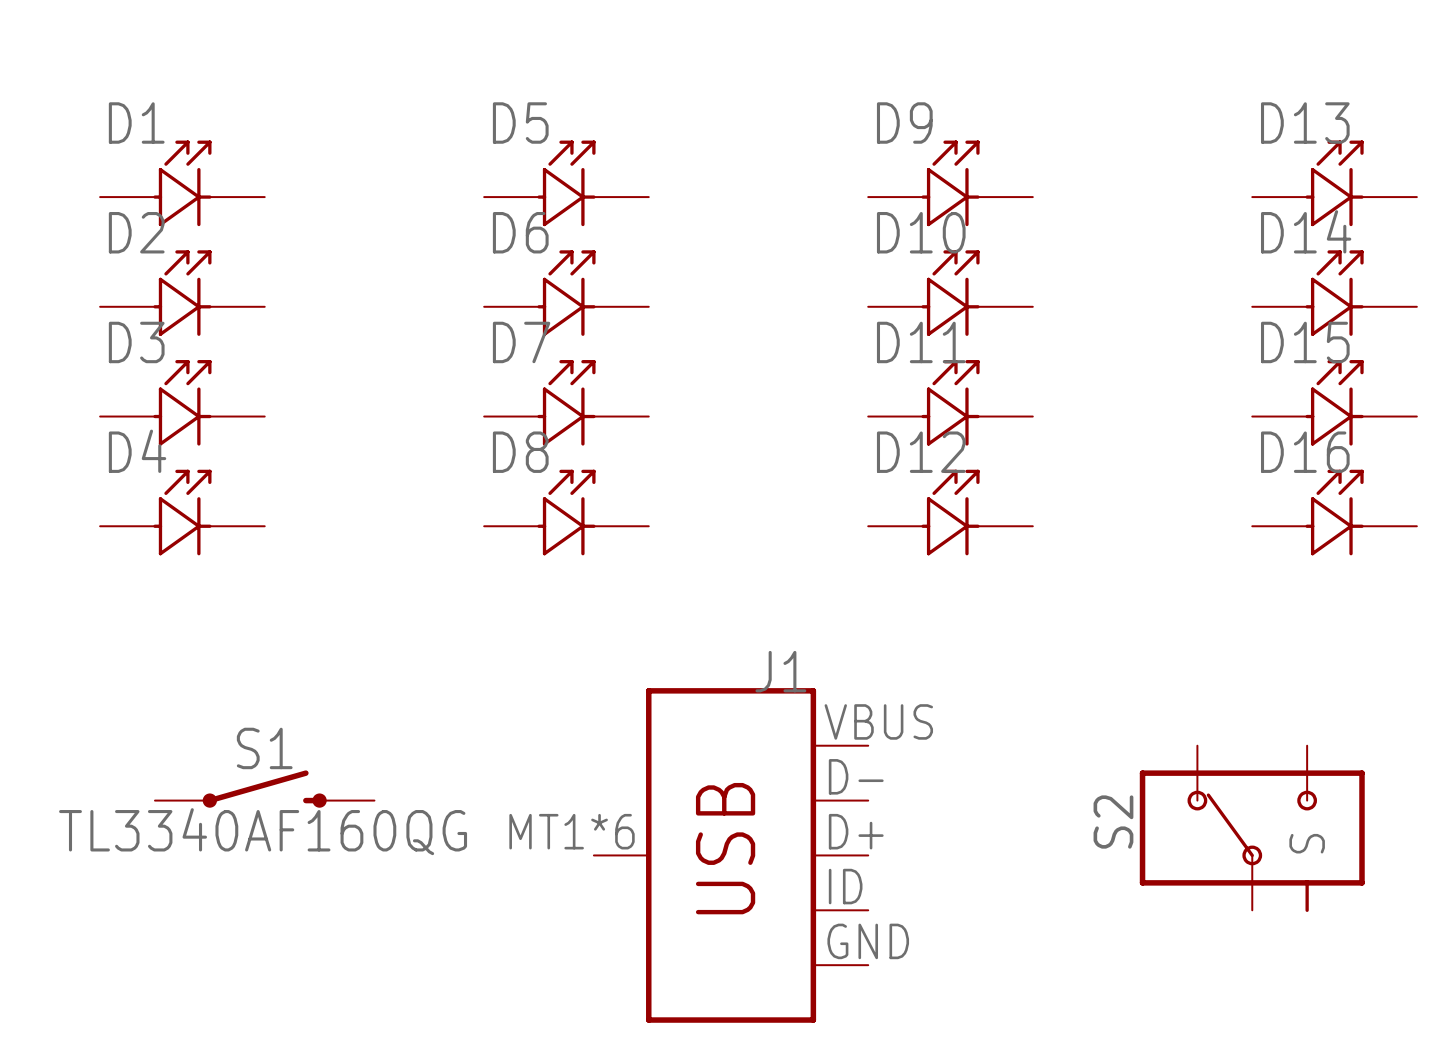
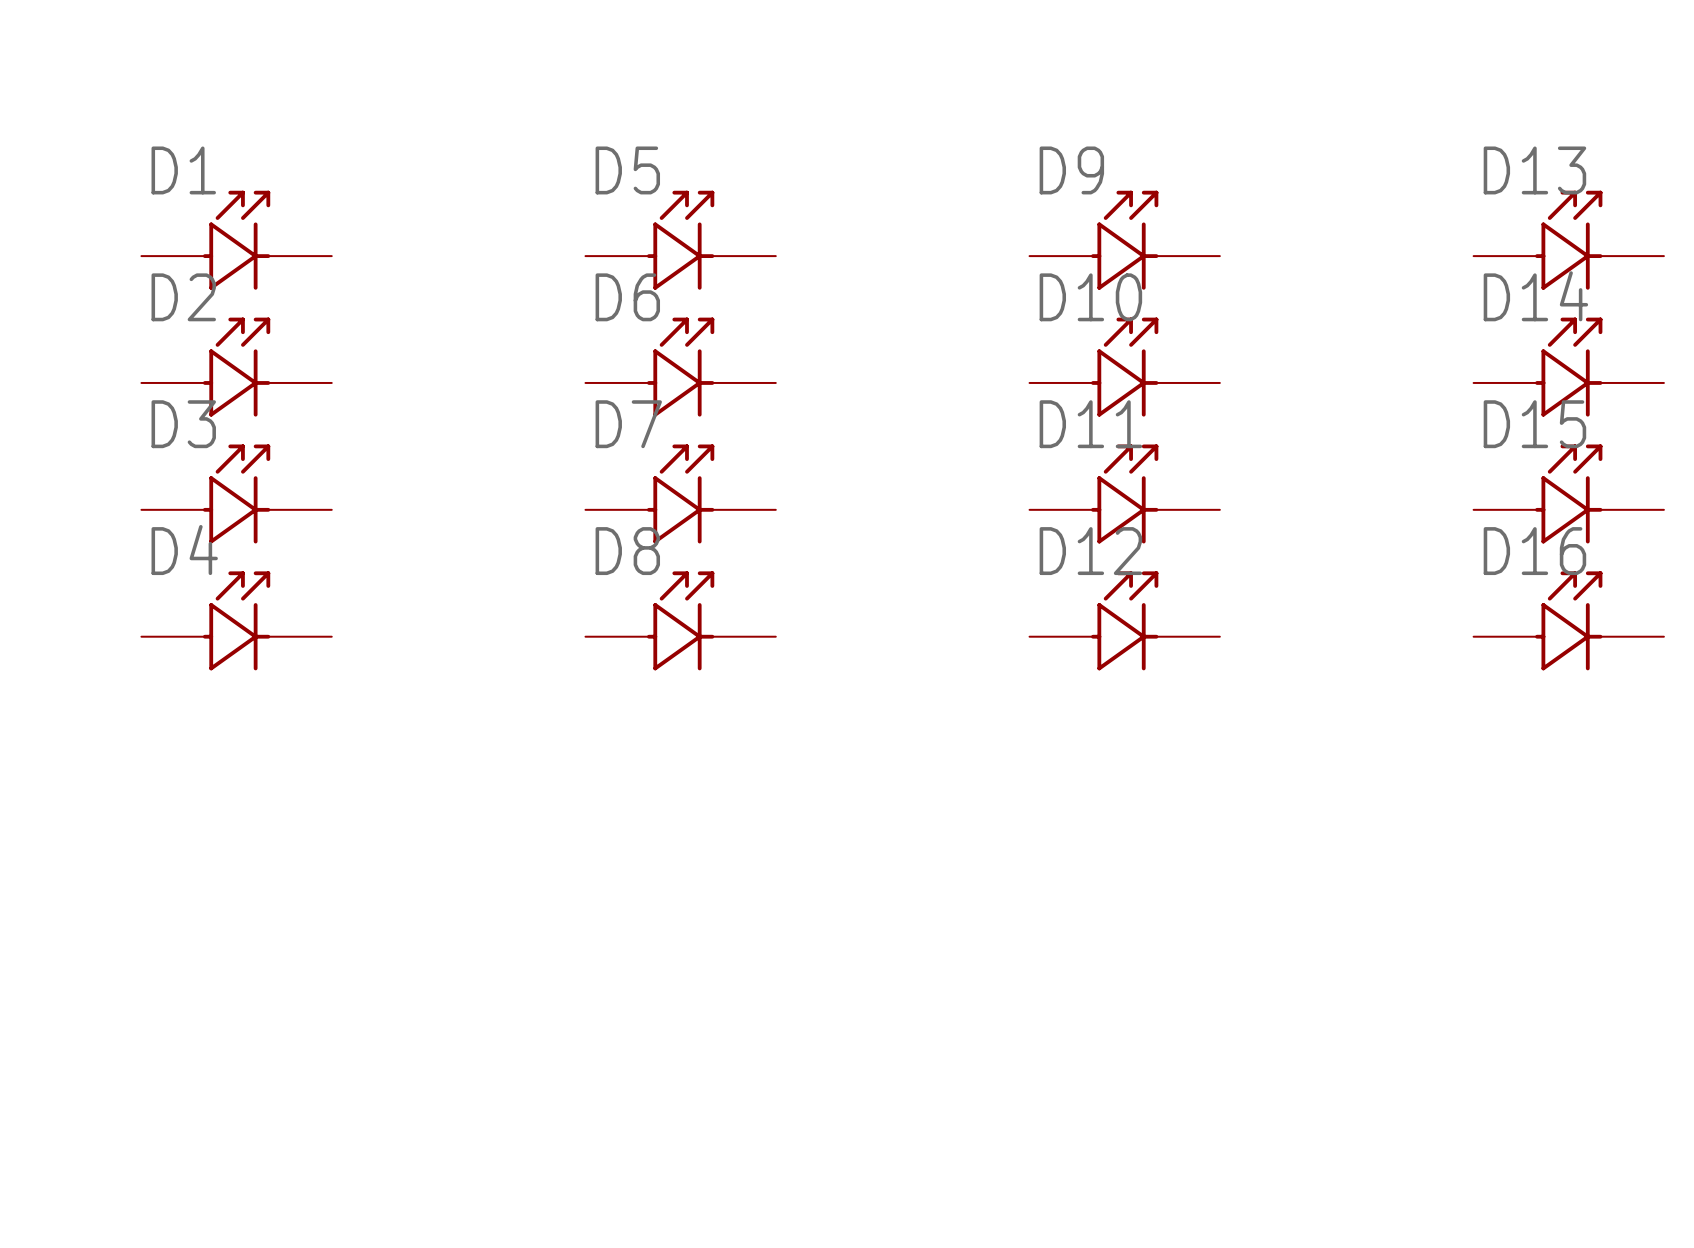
S1: TL3340AF160QG (264, 789) -> none
S2: (1252, 828) -> none
J1: (731, 855) -> none

